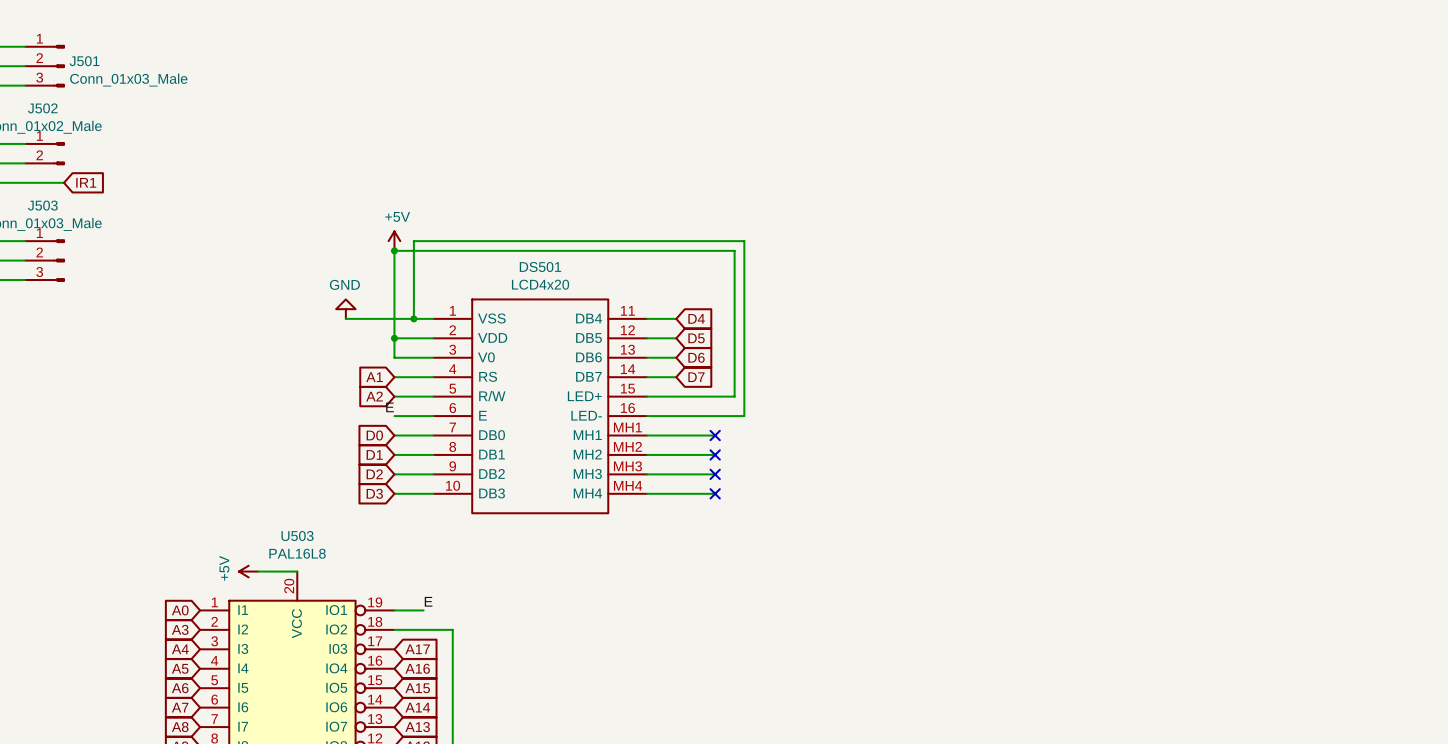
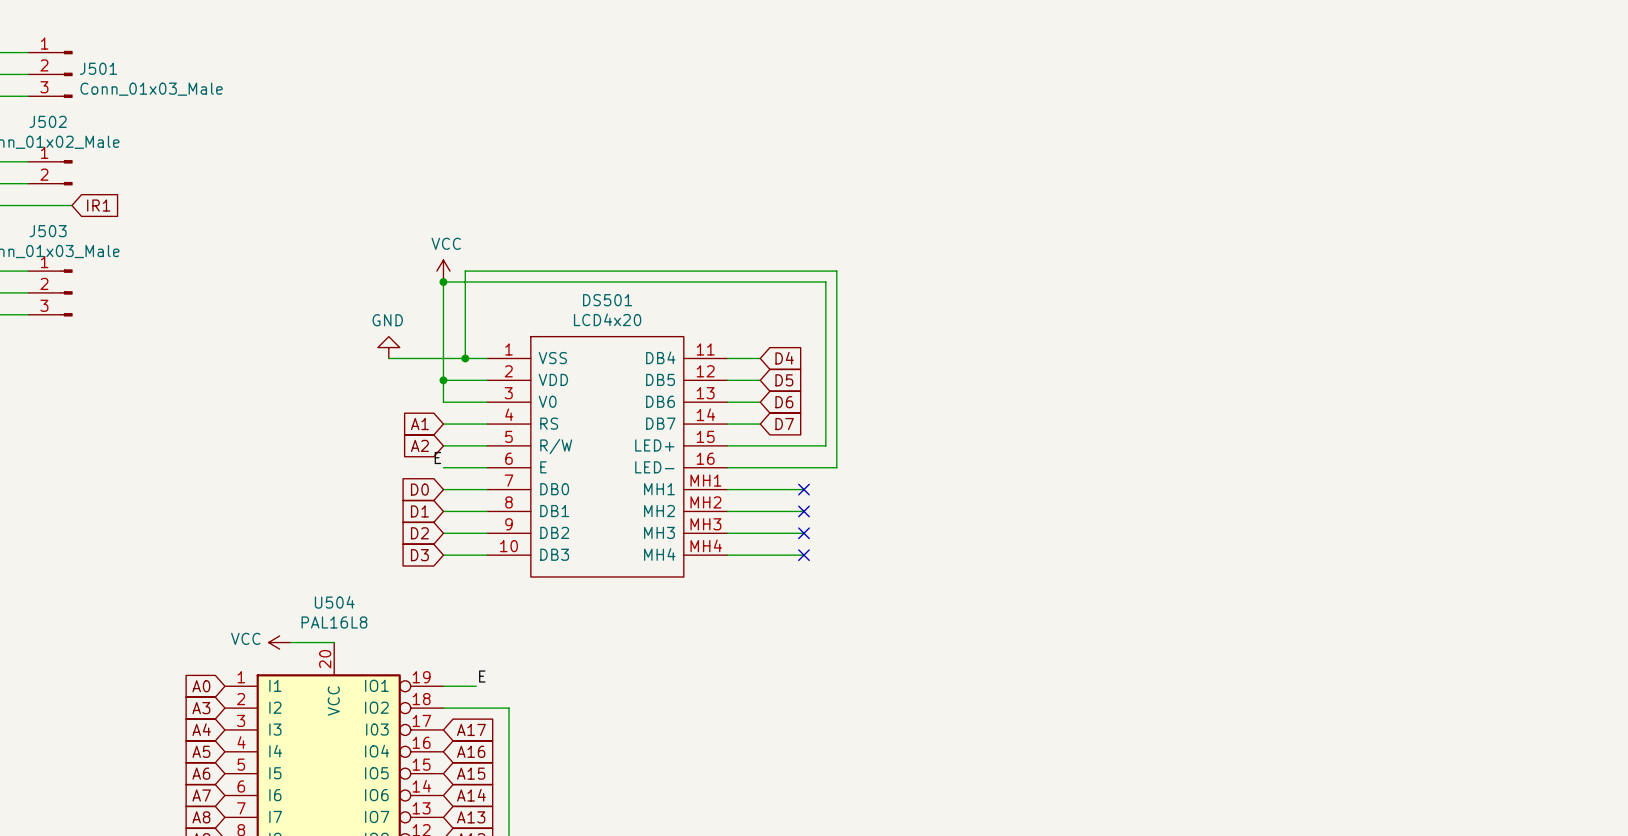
power symbol: +5V (394, 241) -> VCC (443, 271)
U503 name: U503 (297, 536) -> U504 (334, 602)
power symbol: +5V (248, 571) -> VCC (279, 642)

